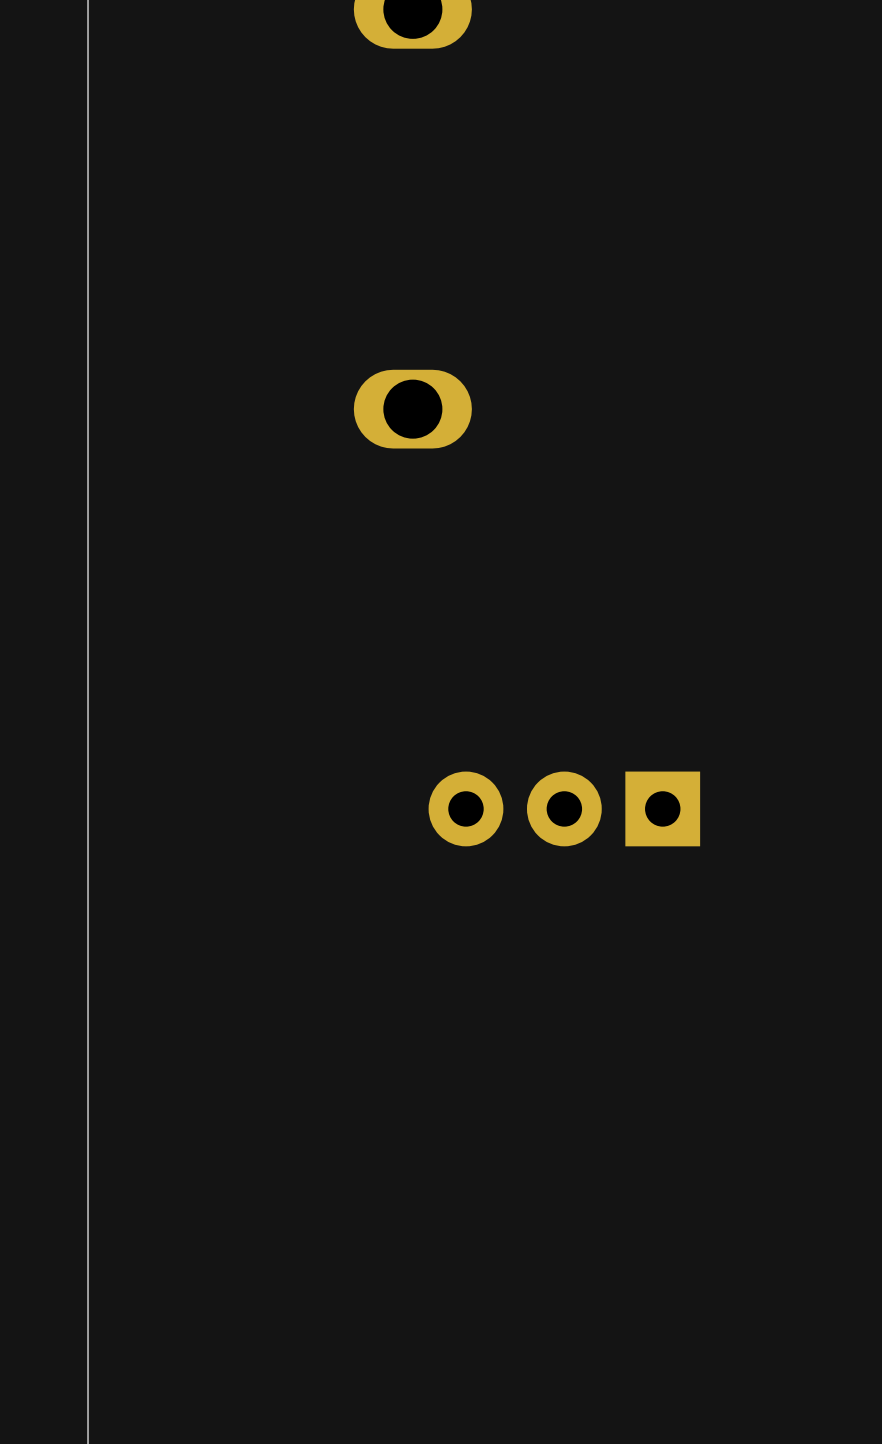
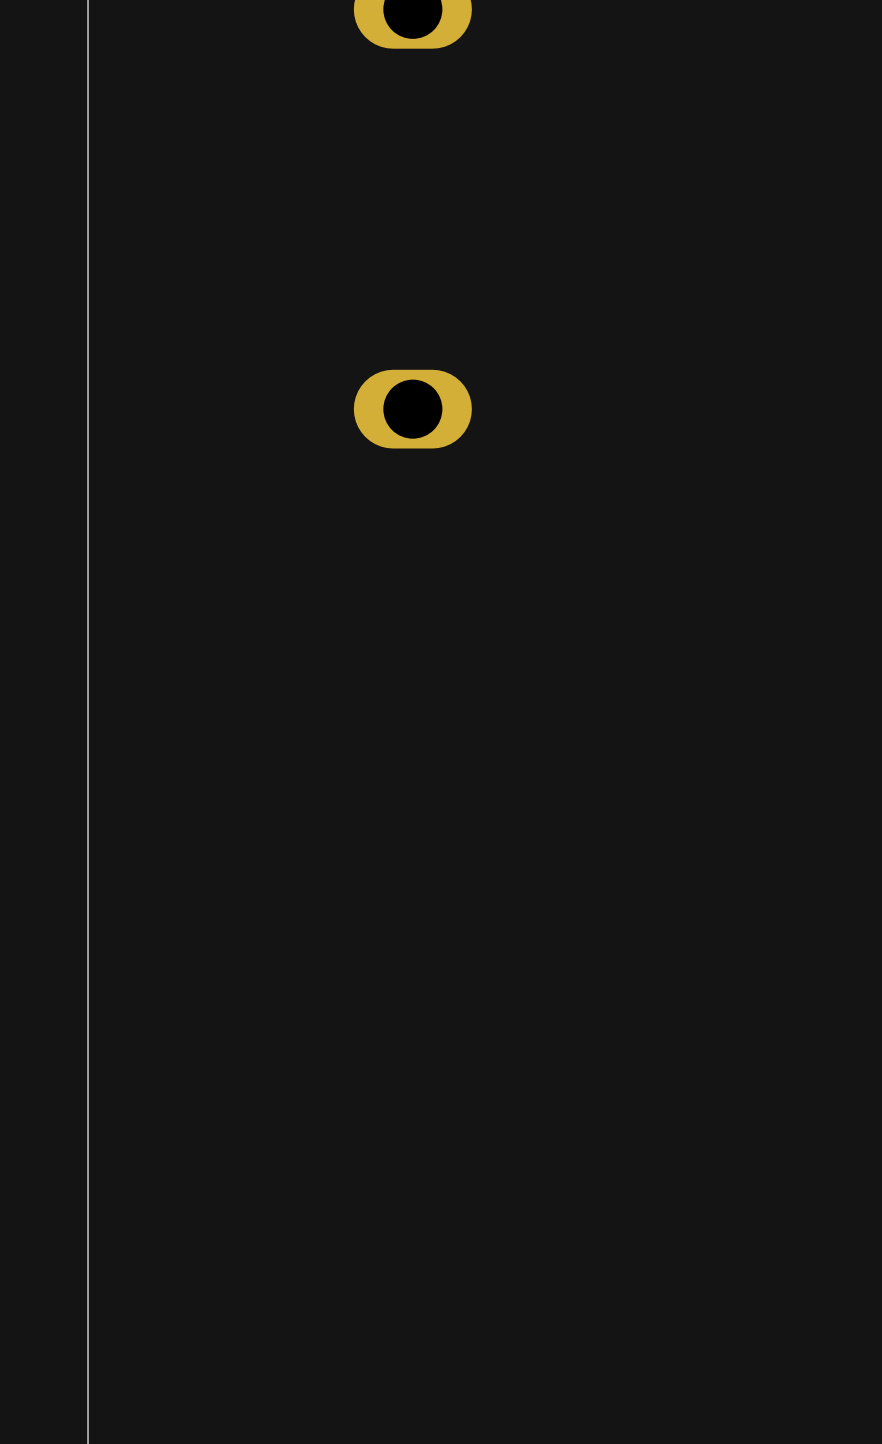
part: (564, 808) -> none

